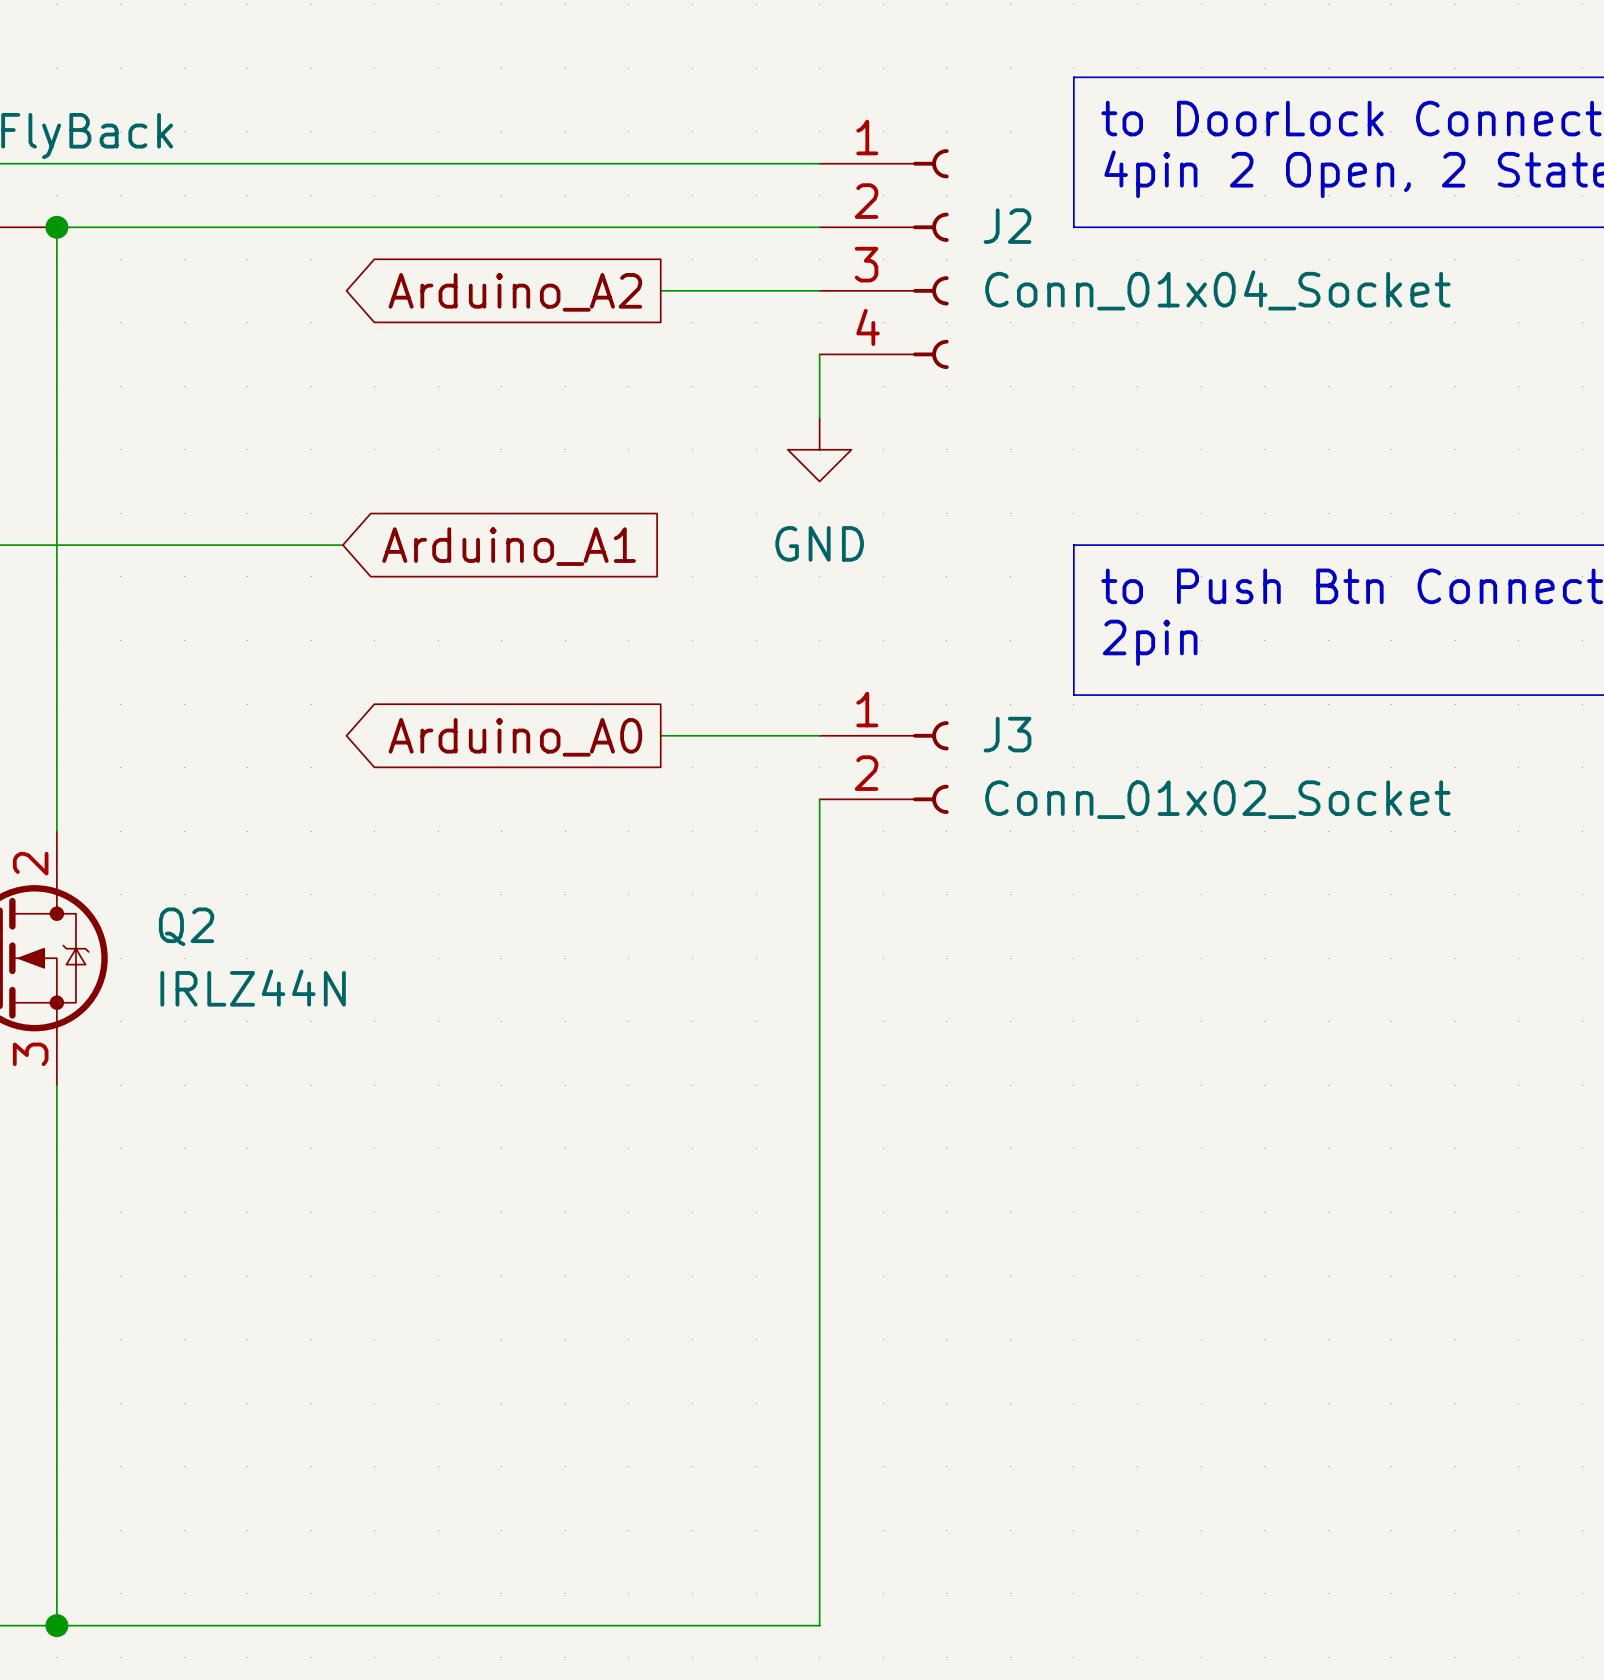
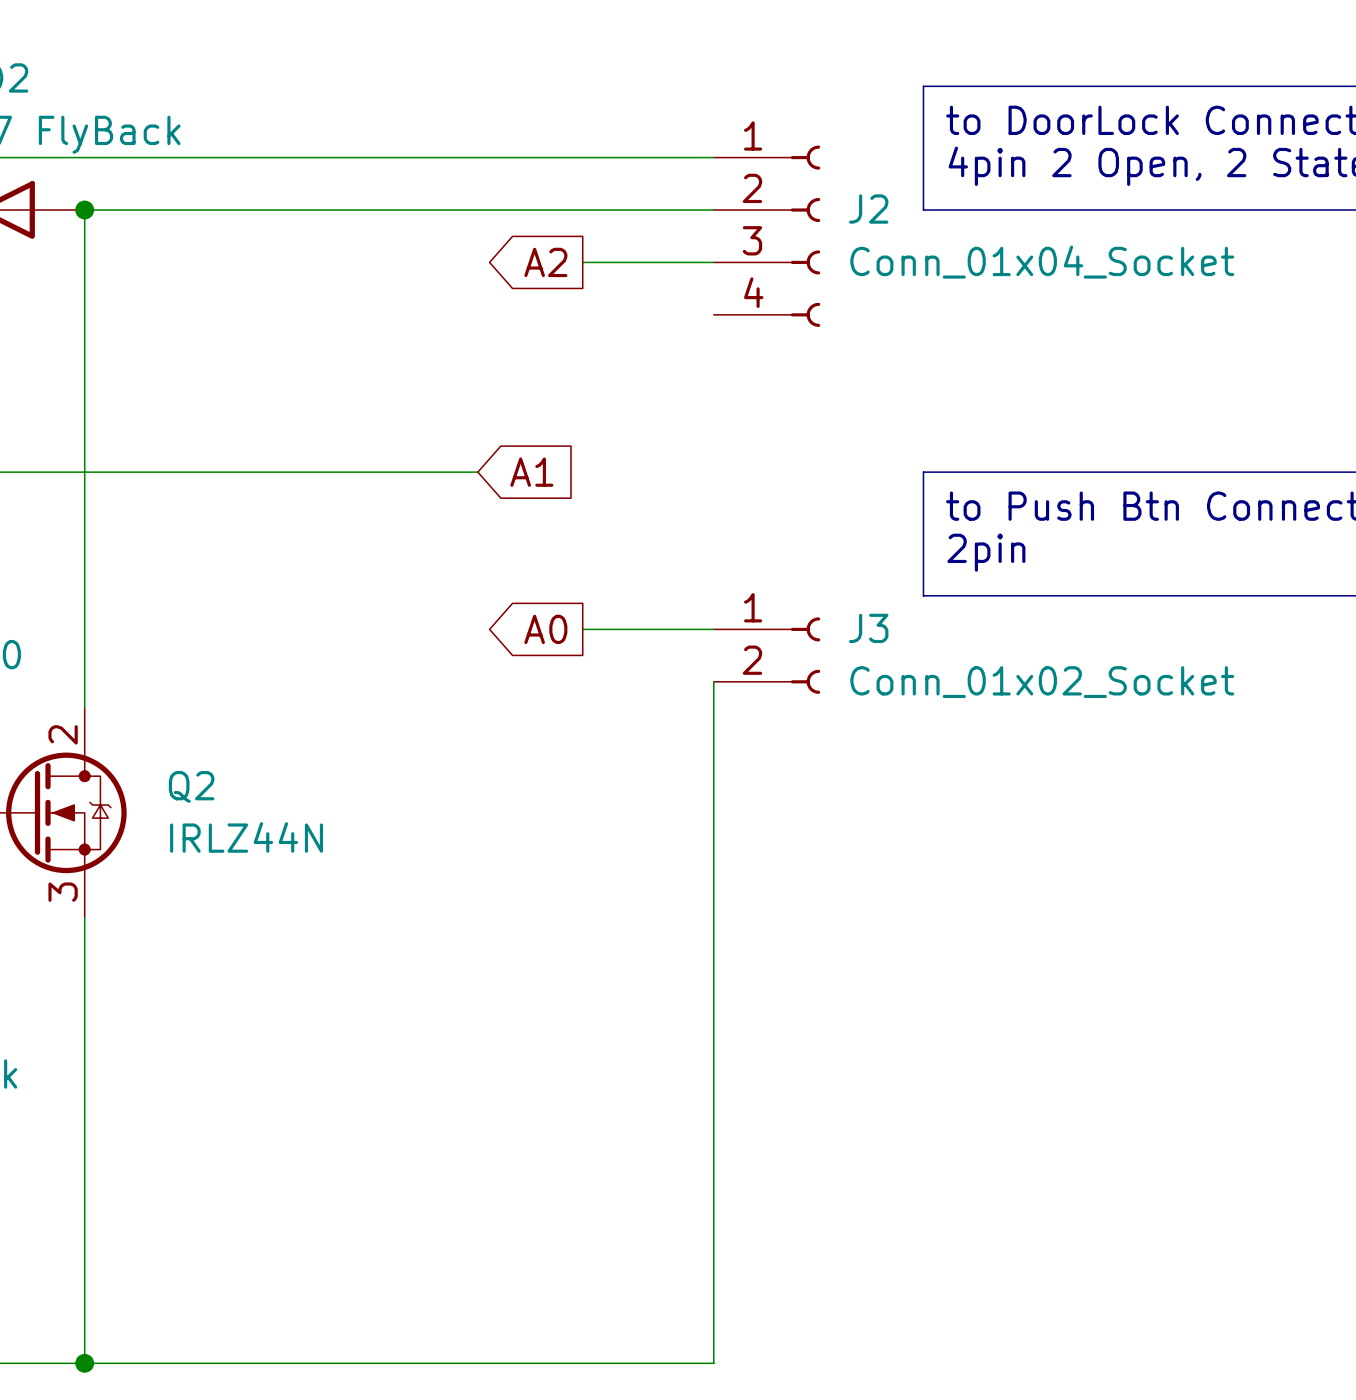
global label: Arduino_A2 (515, 292) -> A2 (545, 262)
wire: (819, 354) (819, 417) -> none
power symbol: GND (819, 449) -> none
wire: none -> (320, 472) (477, 472)
global label: none -> A1 (531, 472)
global label: Arduino_A1 (509, 546) -> none
global label: Arduino_A0 (515, 737) -> A0 (545, 629)

